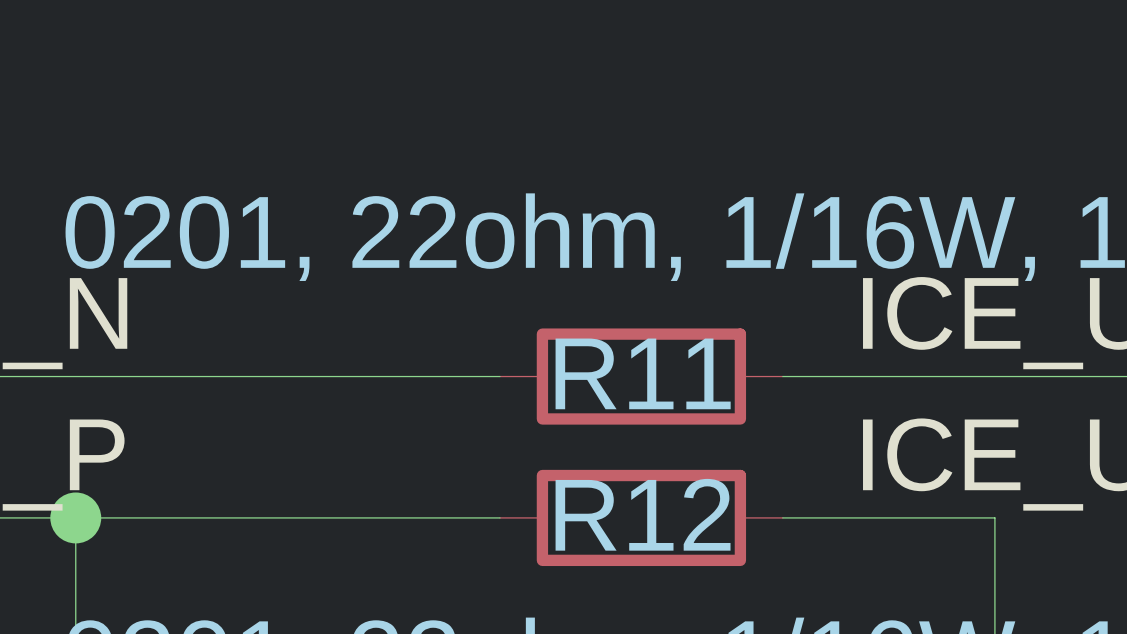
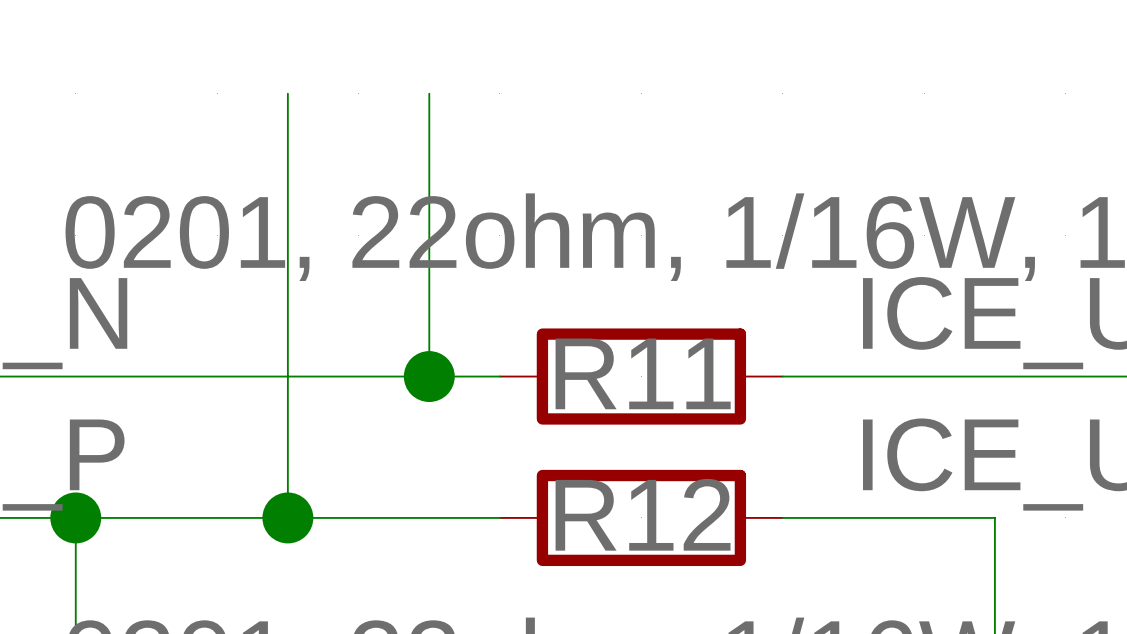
wire: none -> (287, 93) (287, 517)
wire: none -> (429, 93) (429, 376)
junction: none -> (429, 376)
junction: none -> (287, 517)

